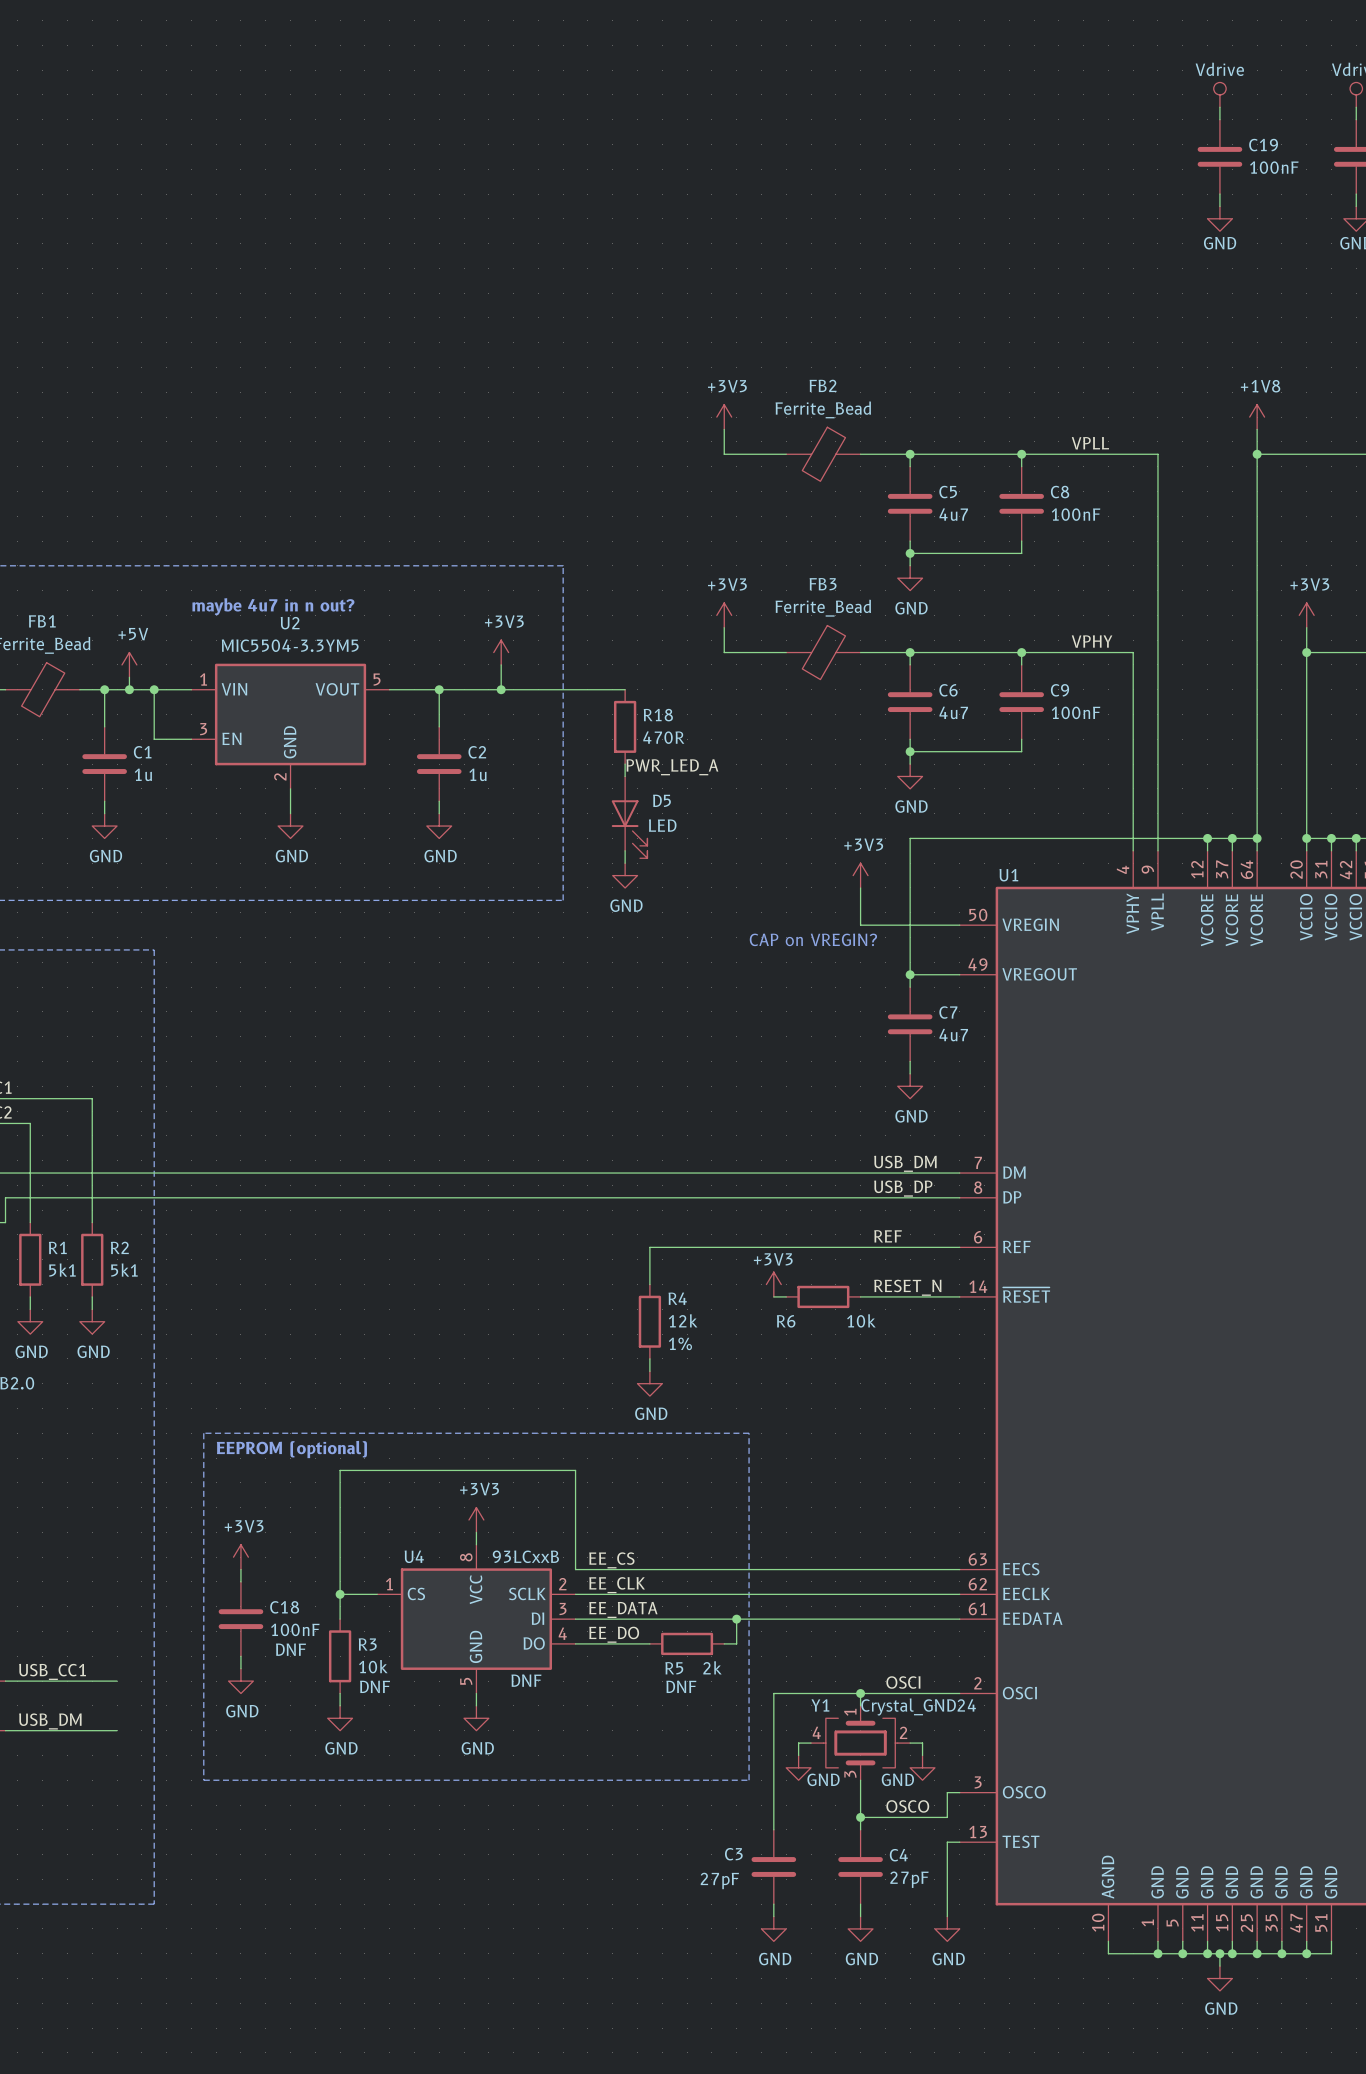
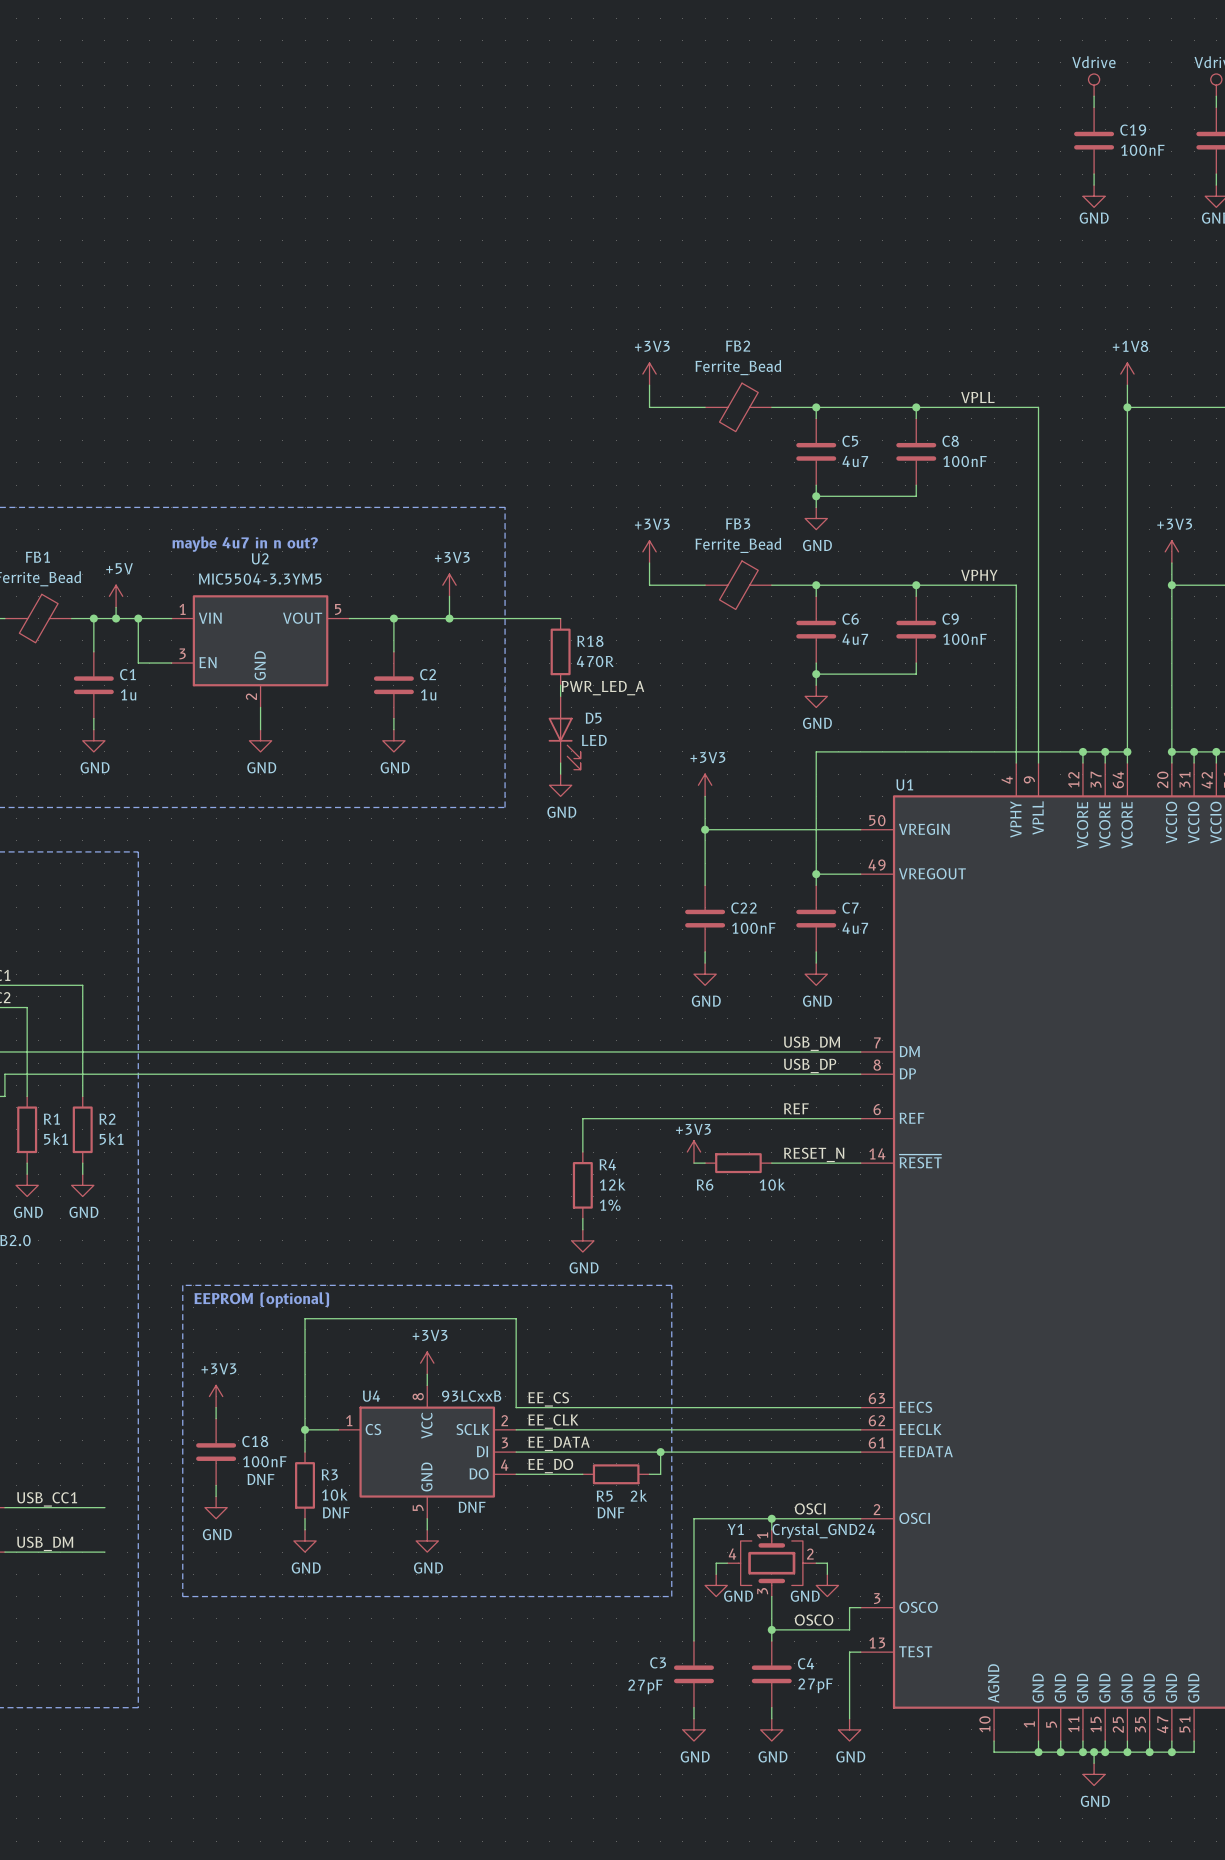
power symbol position: +3V3 (860, 875) -> +3V3 (705, 785)
wire: none -> (705, 796) (705, 885)
wire: (860, 887) (860, 925) -> (705, 829) (771, 829)
junction: none -> (705, 829)
text: CAP on VREGIN? (813, 939) -> none
C22: none -> 100nF (705, 918)
wire: none -> (705, 951) (705, 963)
power symbol: none -> GND (705, 974)

